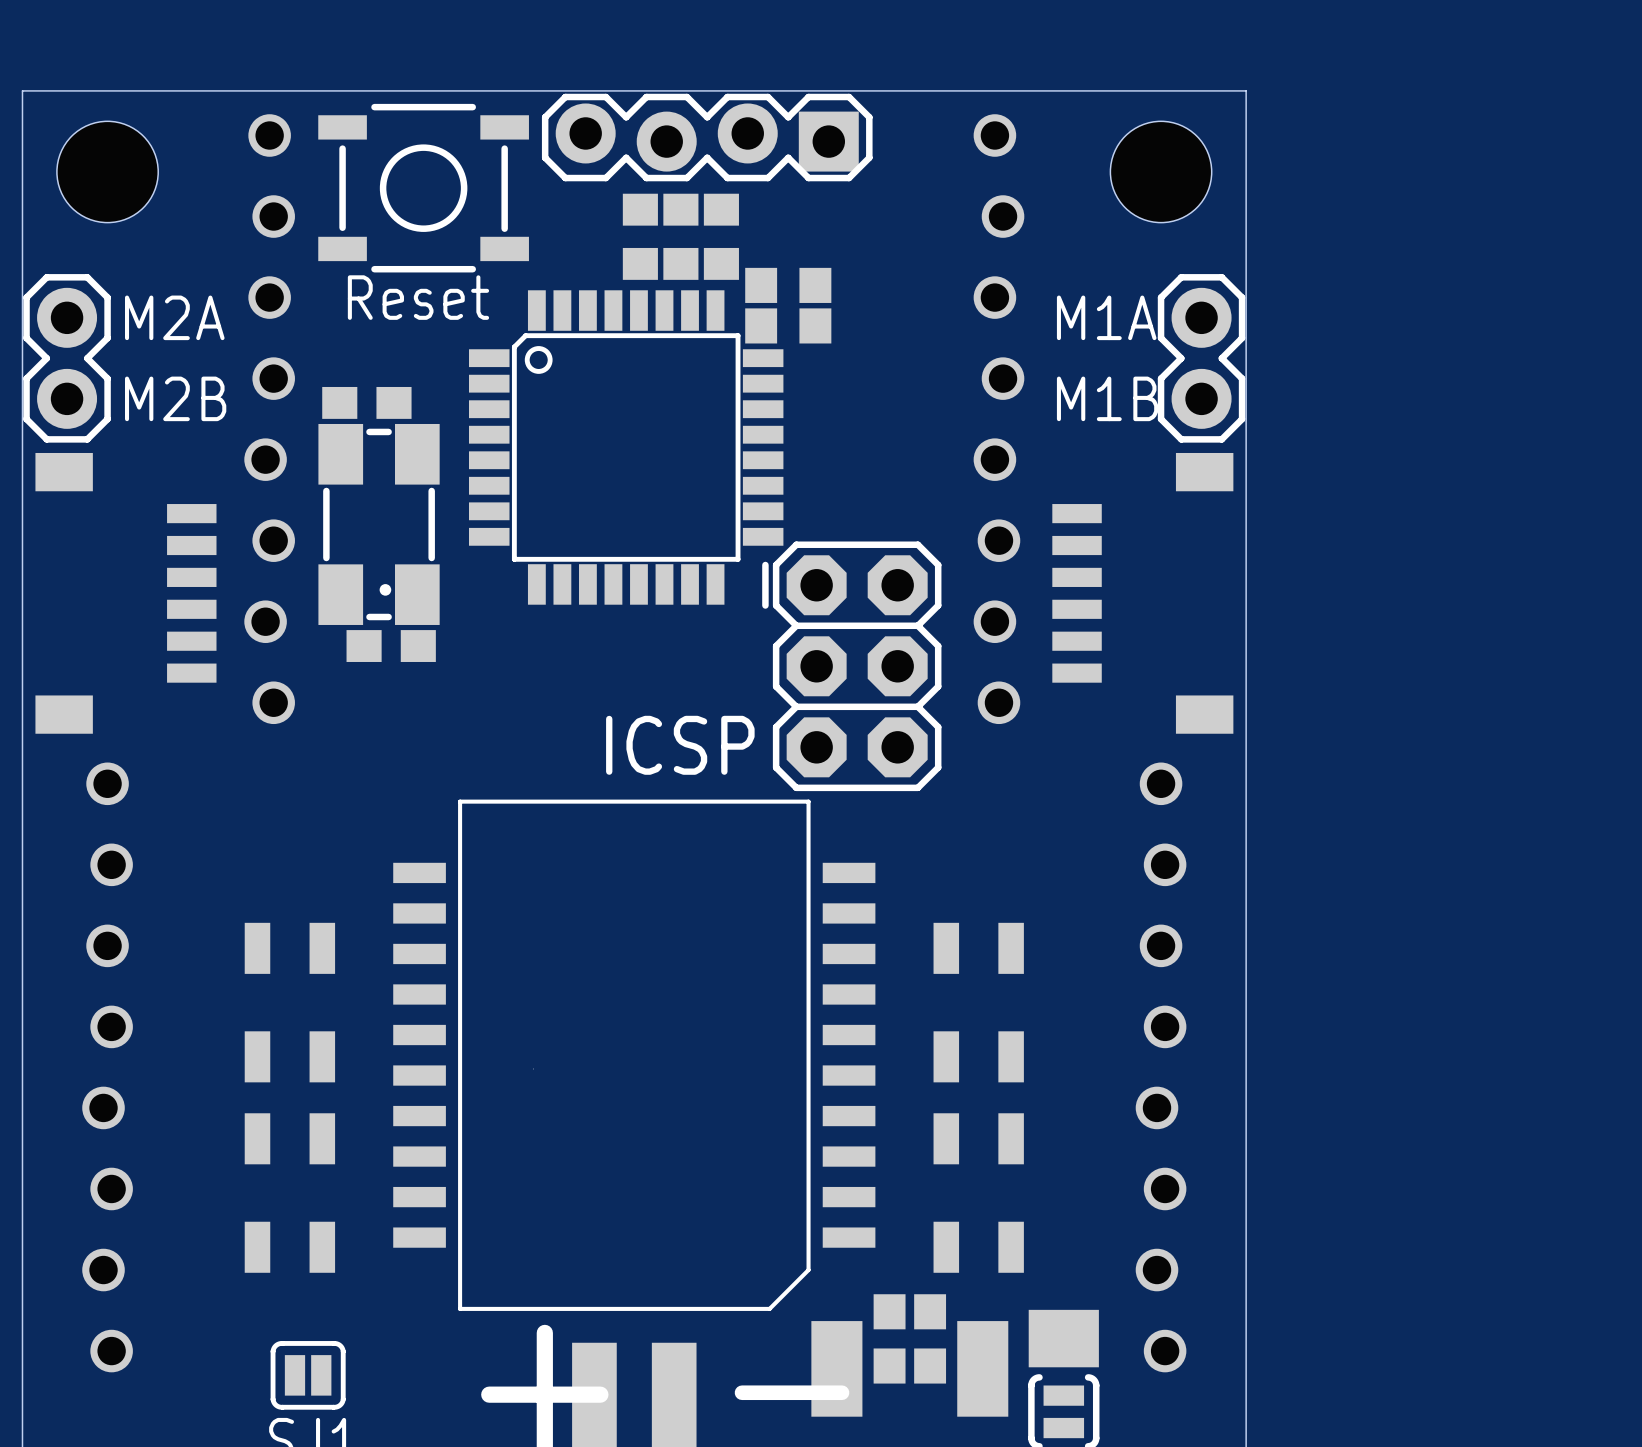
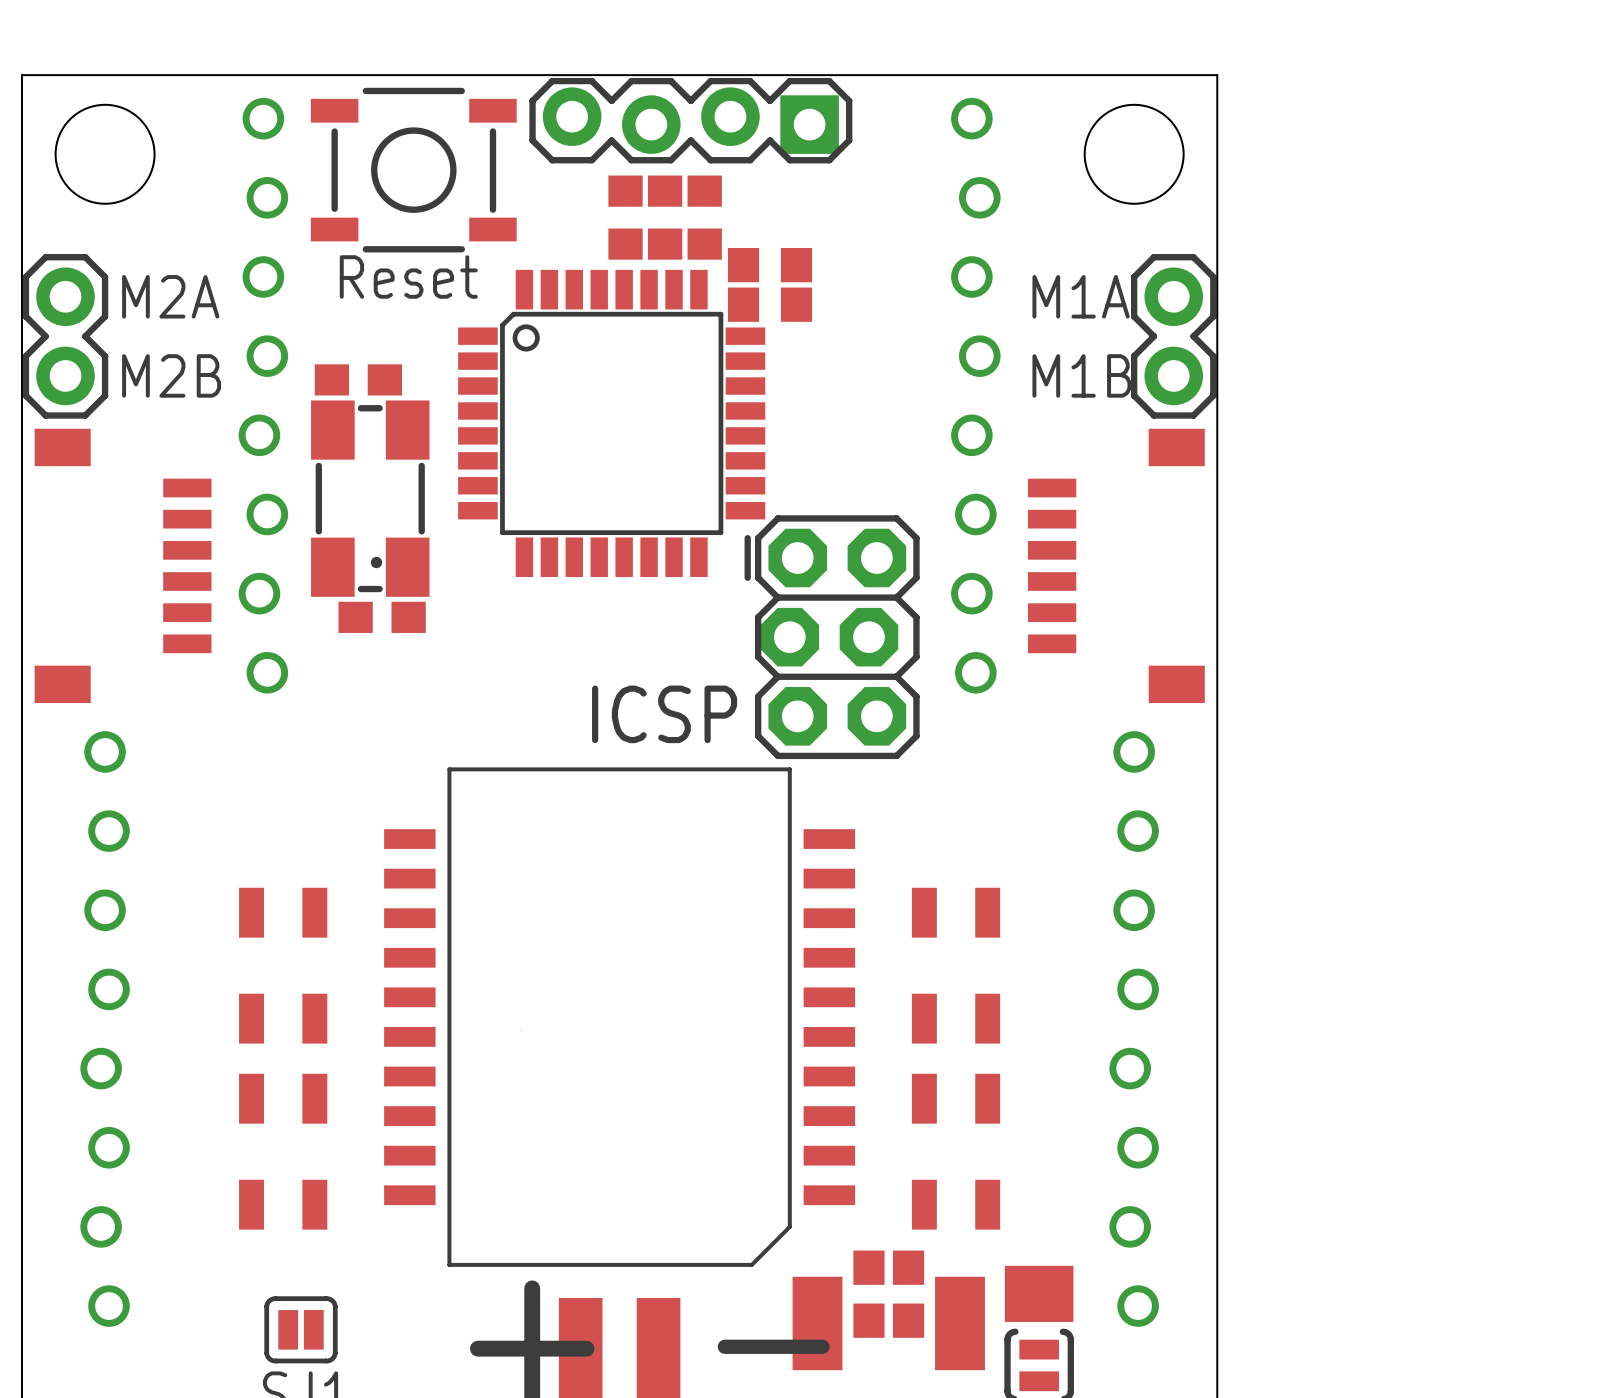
part footprint: [762, 541, 942, 792] -> [744, 515, 920, 760]

